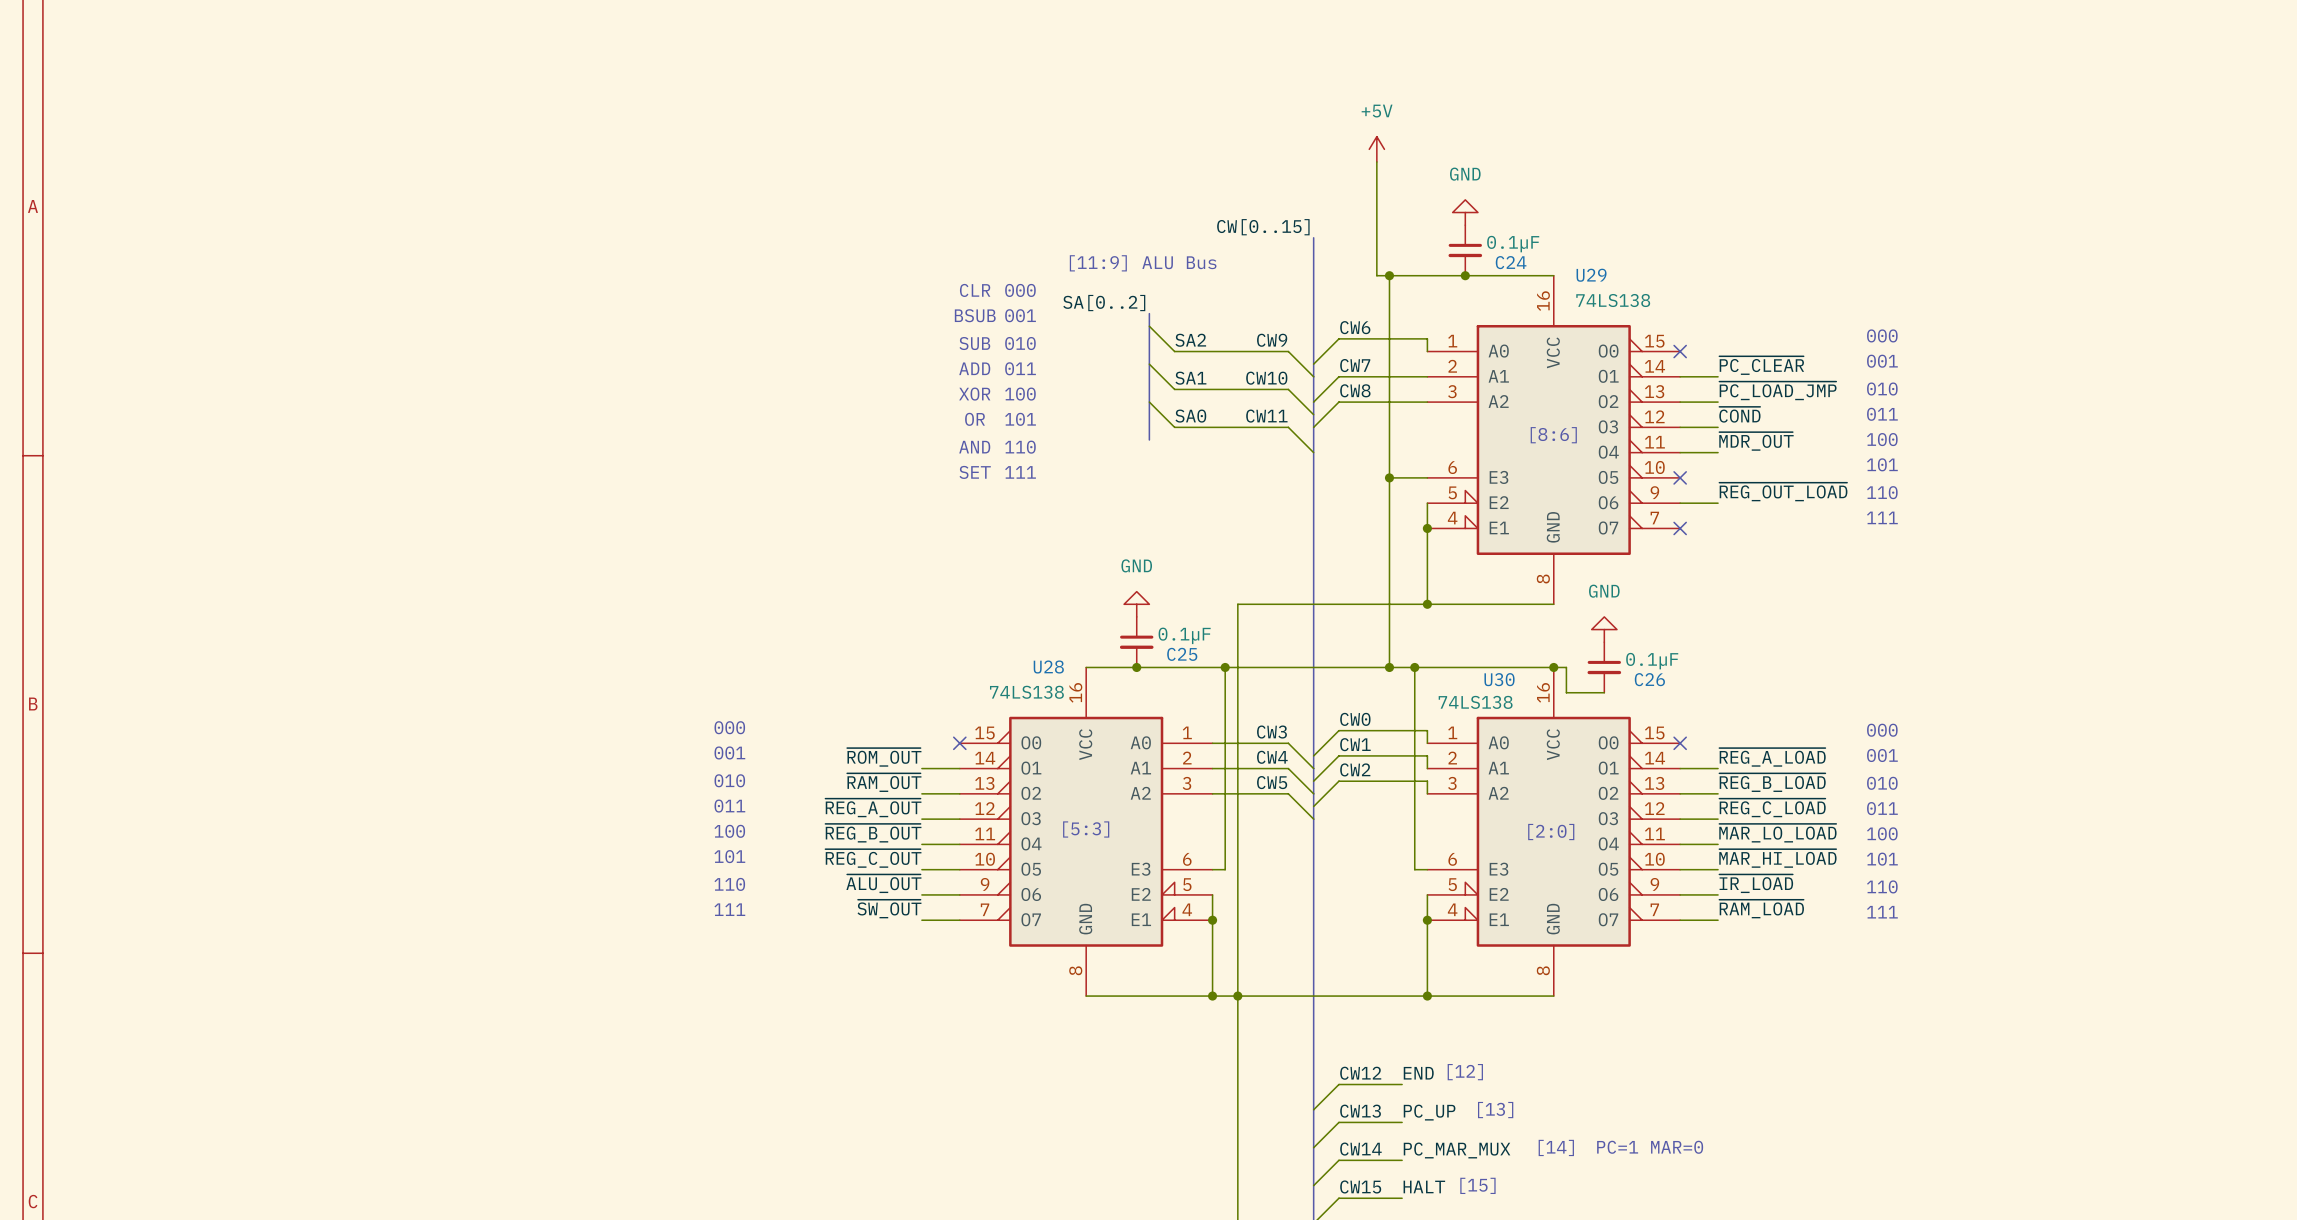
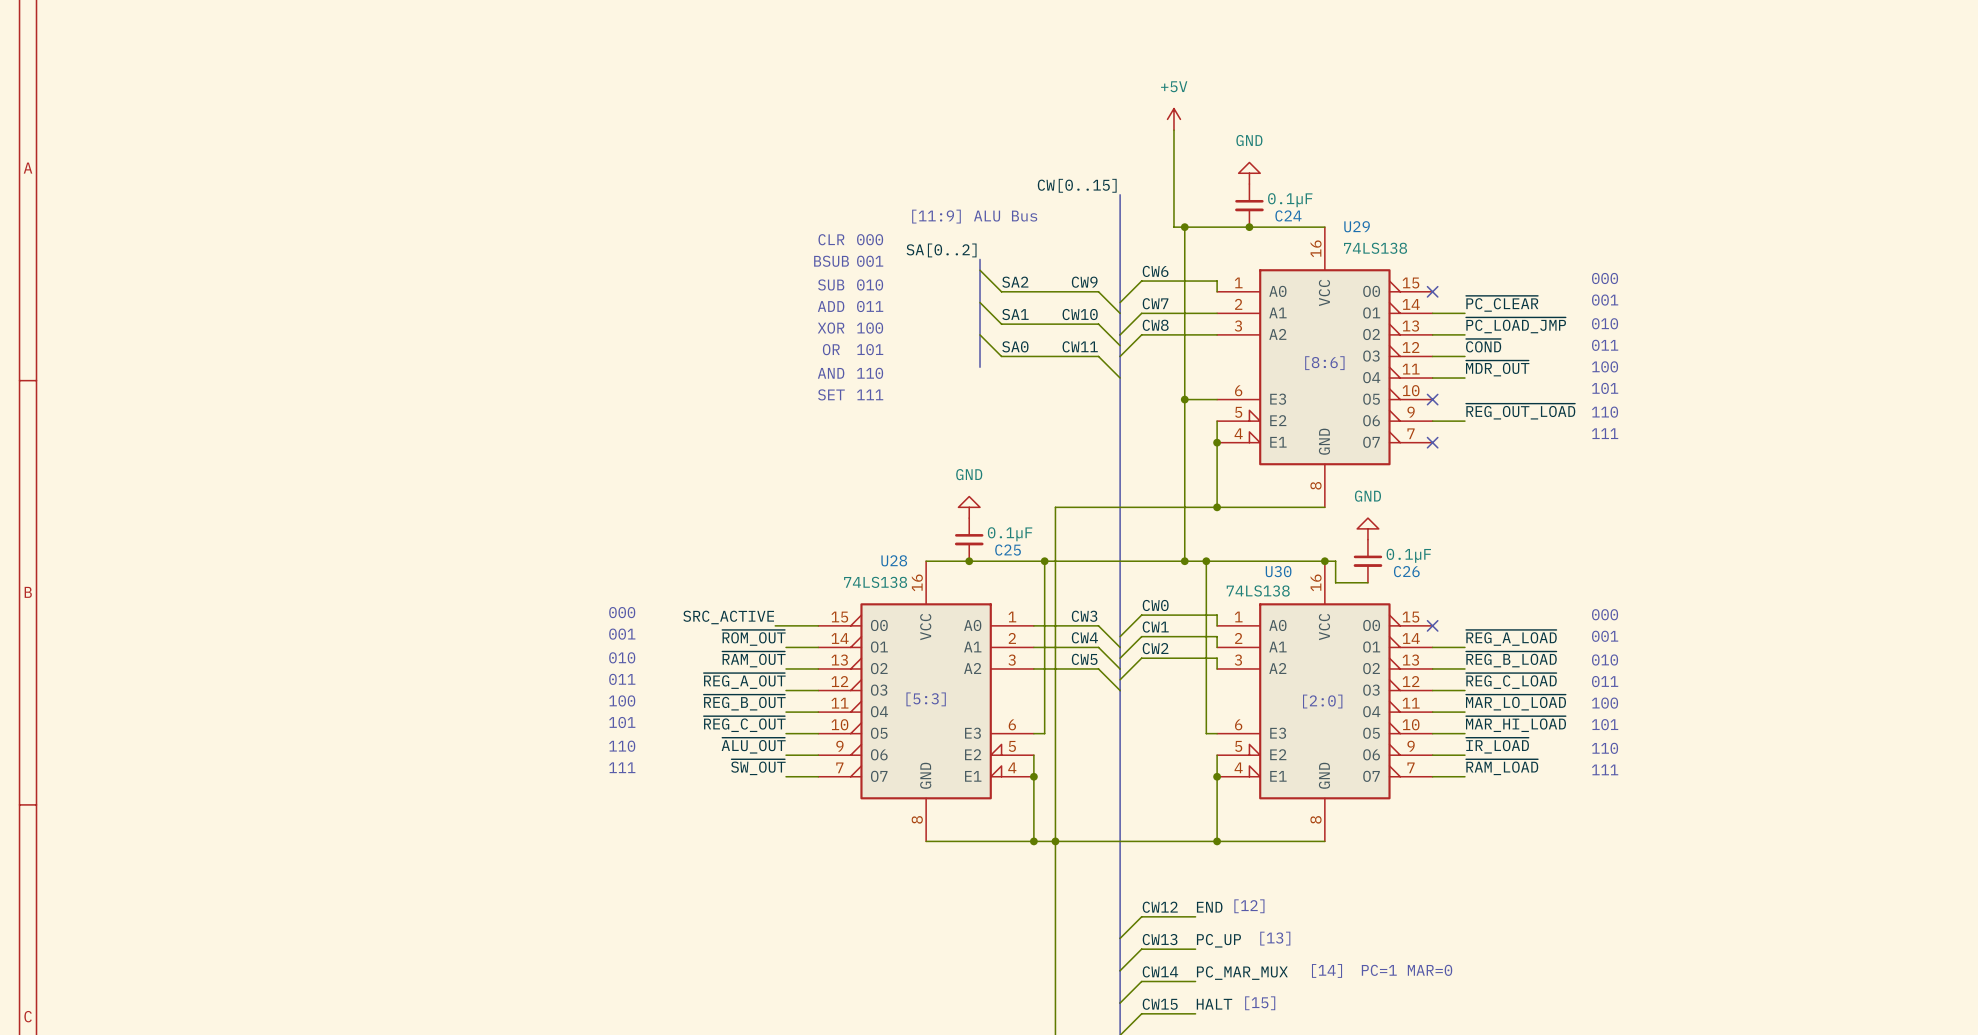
label: none -> SRC_ACTIVE (728, 617)
wire: none -> (775, 625) (818, 625)
no-connect mark: (959, 743) -> none

